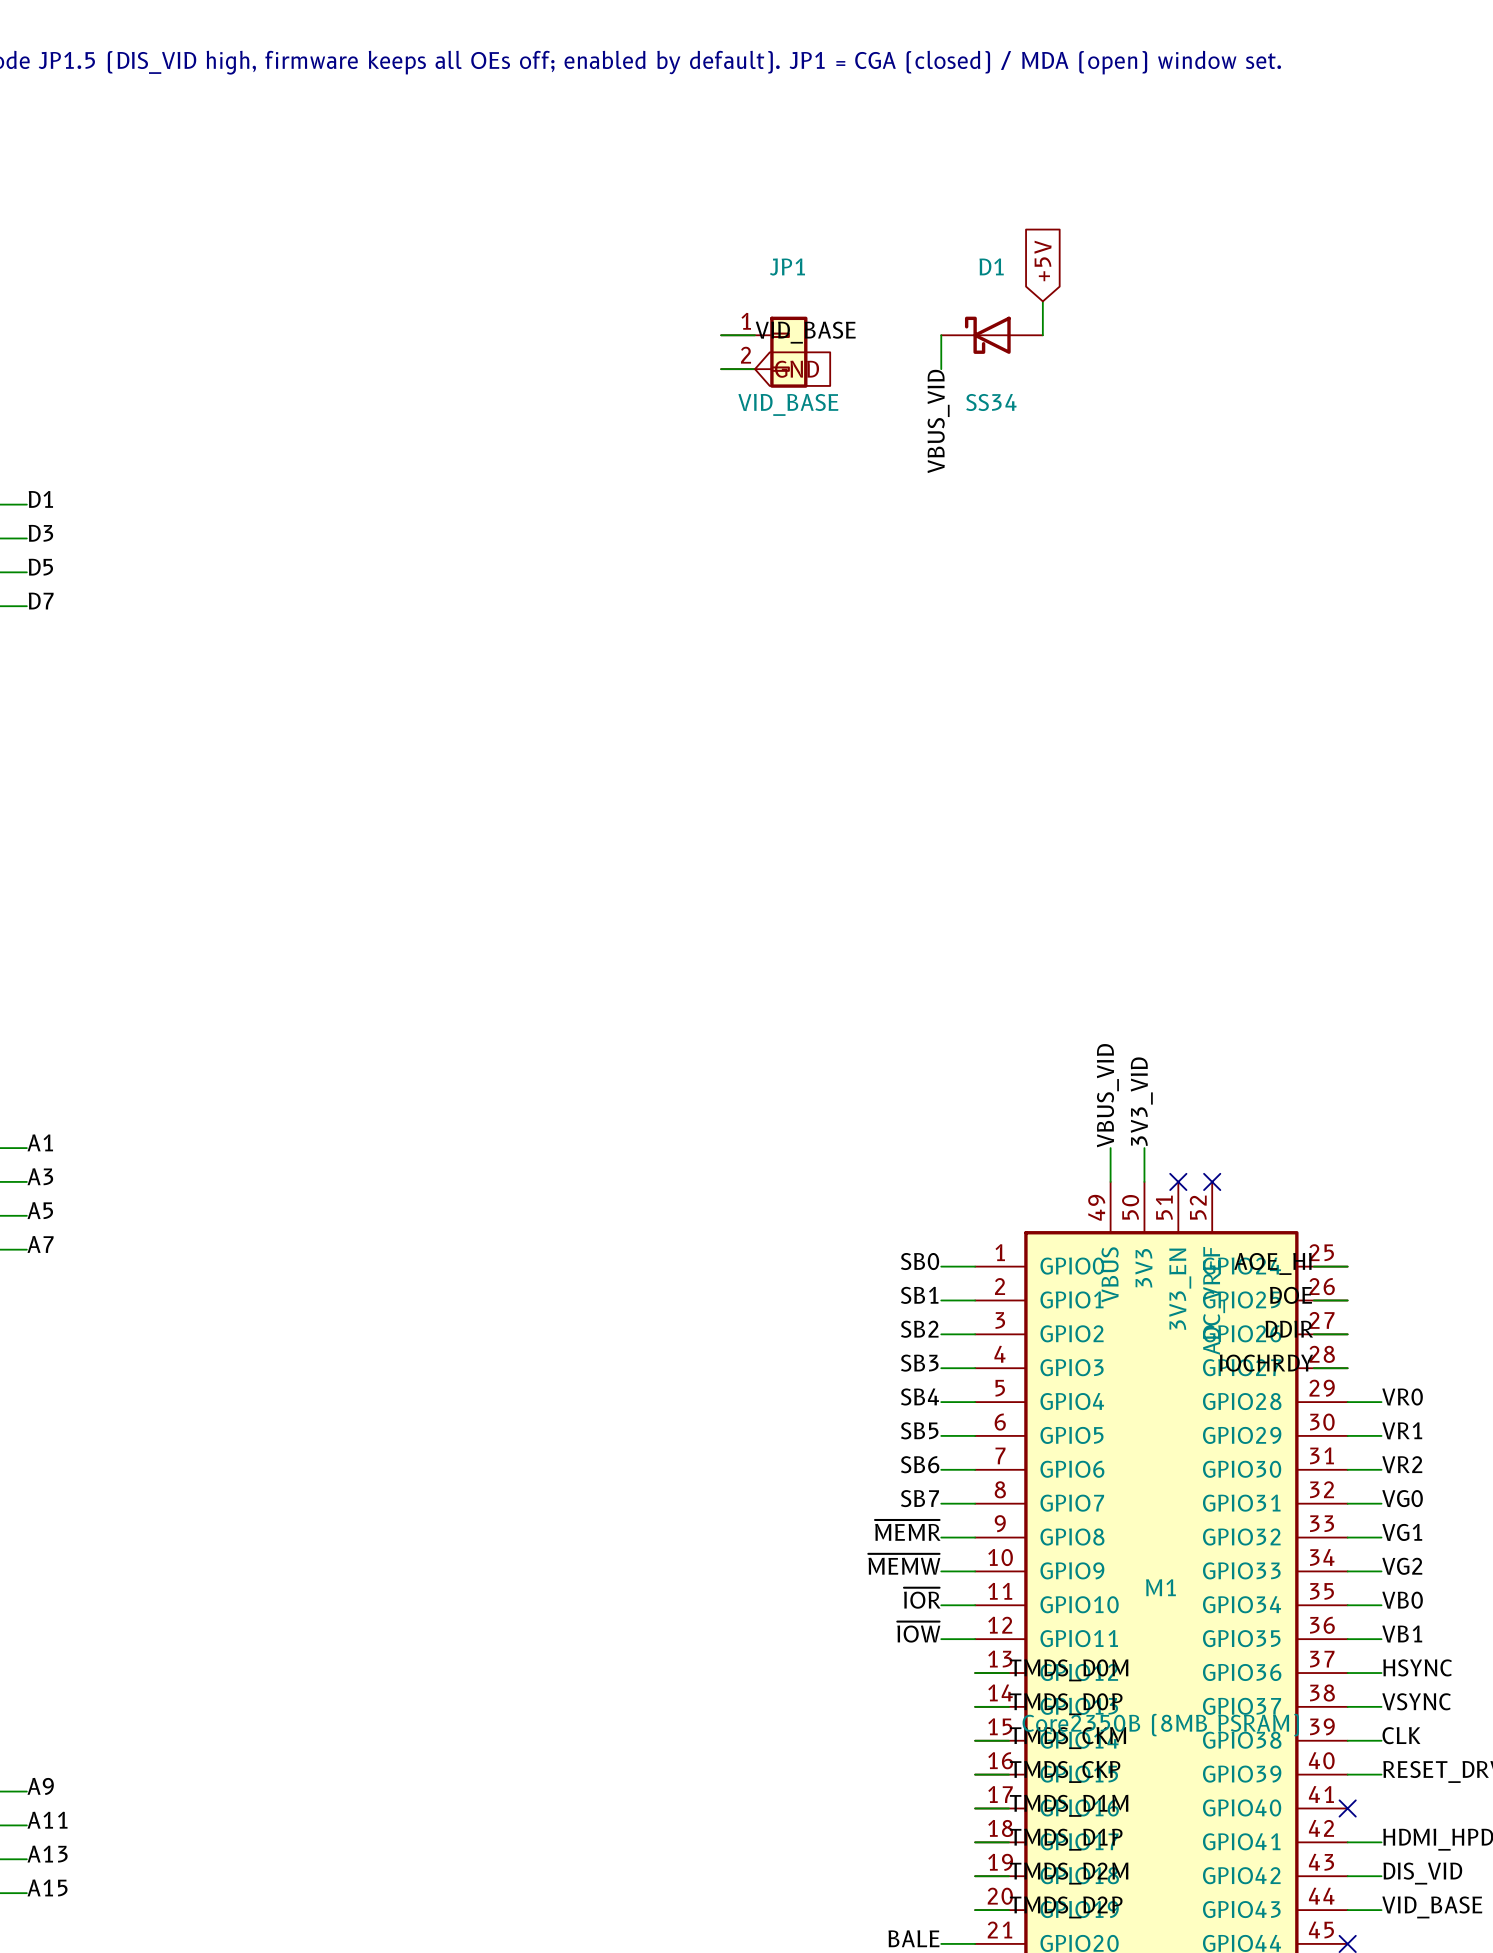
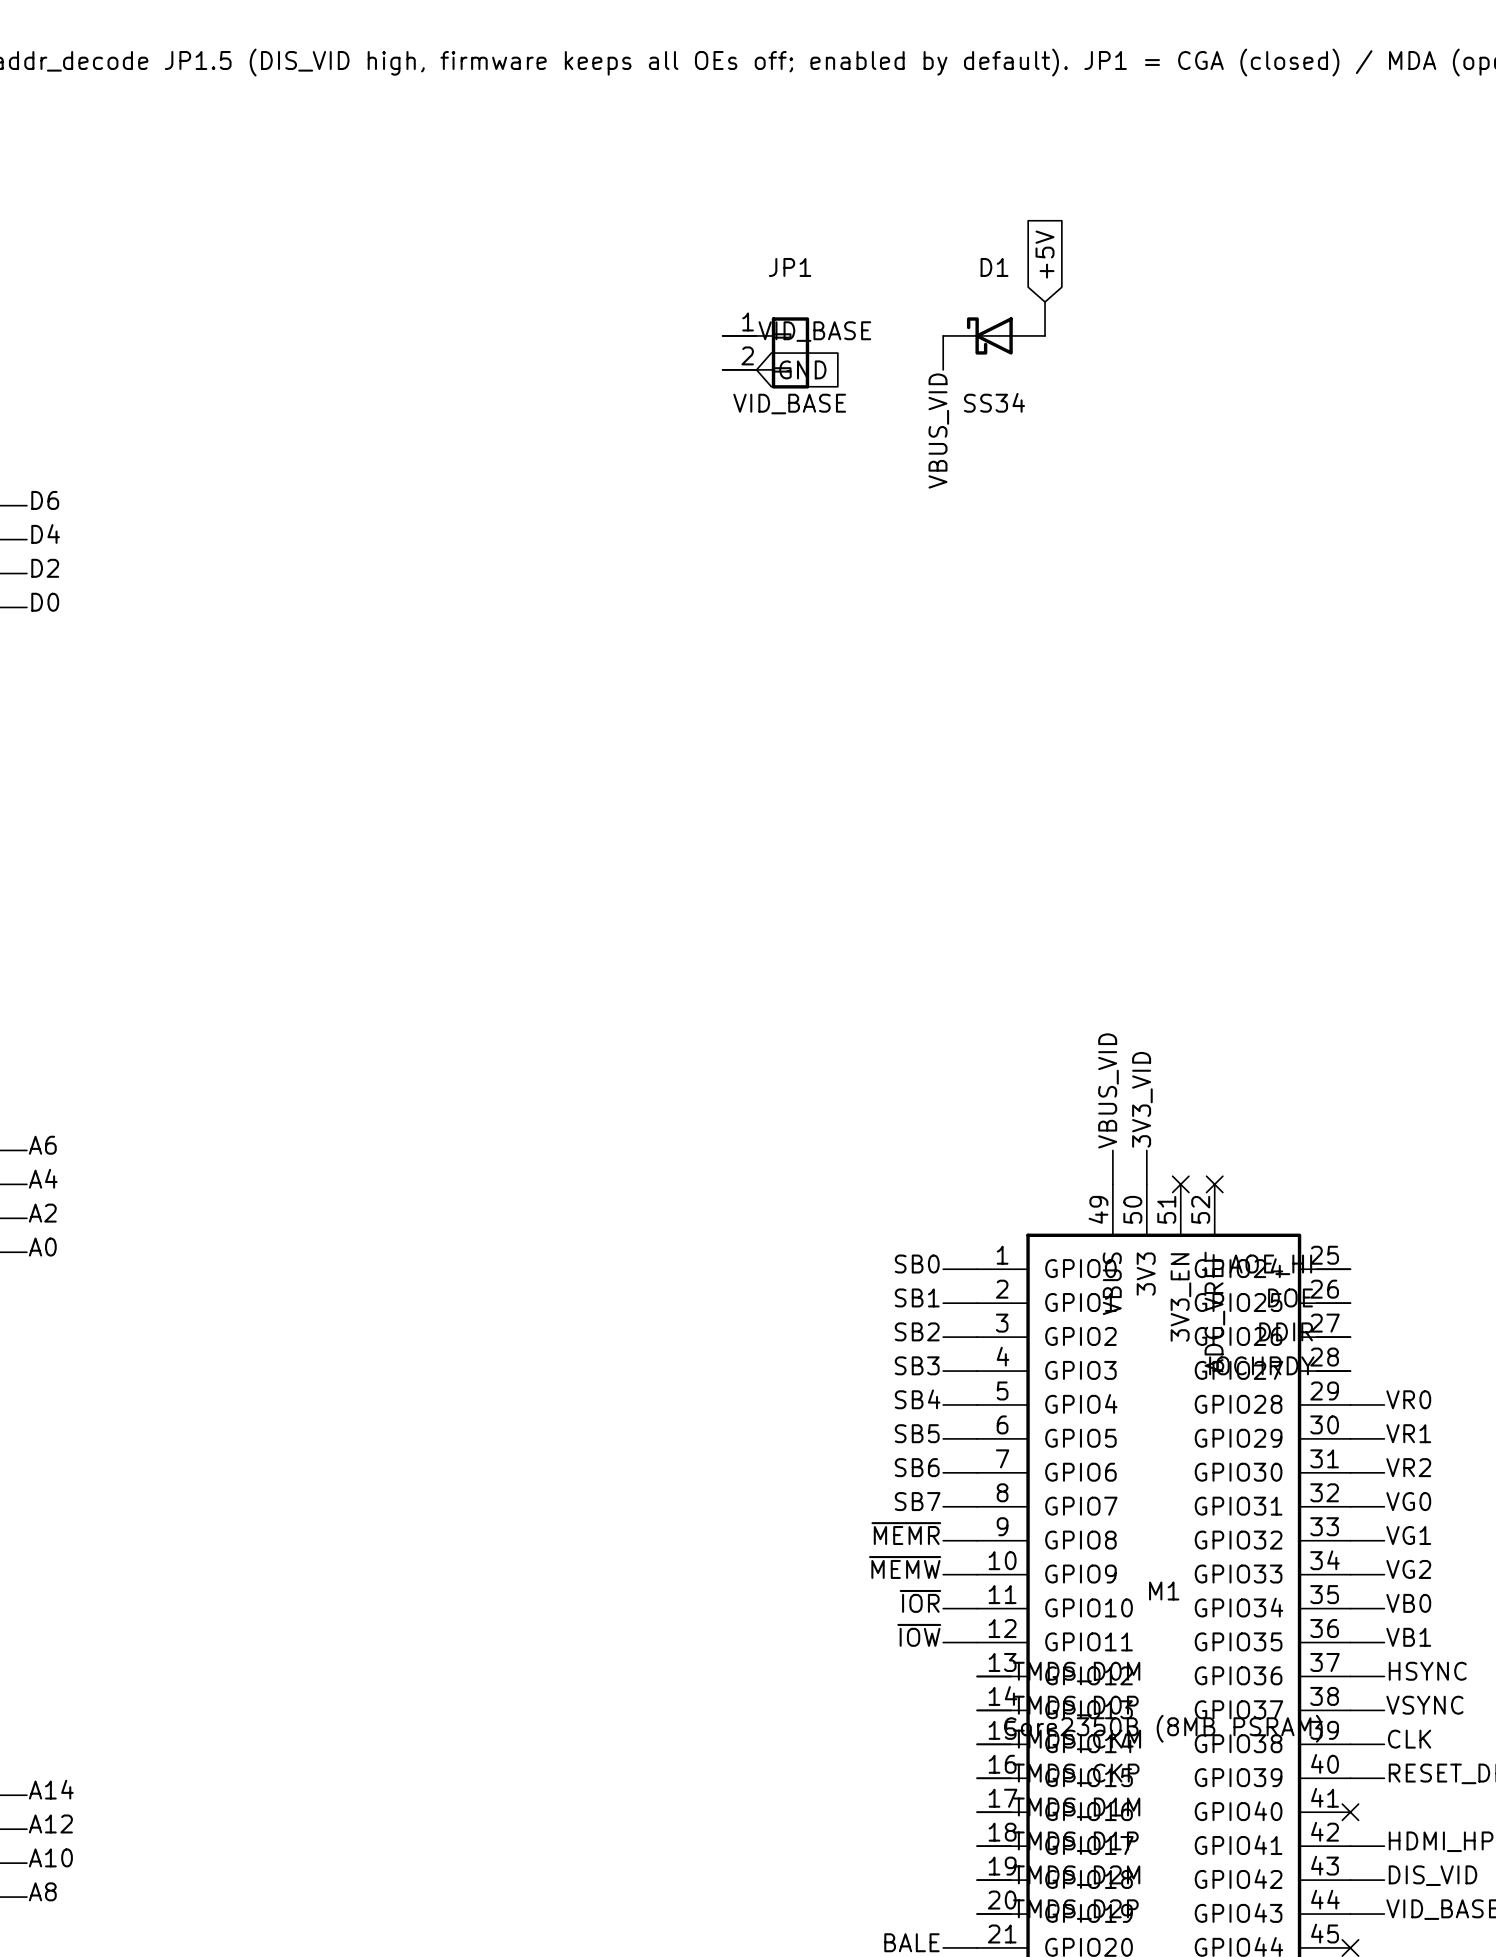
label: D1 (40, 499) -> D6 (45, 500)
label: D3 (40, 533) -> D4 (45, 533)
label: D5 (40, 567) -> D2 (45, 568)
label: D7 (41, 601) -> D0 (45, 602)
label: A1 (40, 1142) -> A6 (42, 1145)
label: A3 (40, 1176) -> A4 (43, 1178)
label: A5 (40, 1210) -> A2 (42, 1213)
label: A7 (40, 1244) -> A0 (42, 1247)
label: A9 (40, 1786) -> A14 (51, 1789)
label: A11 (47, 1820) -> A12 (50, 1823)
label: A13 (47, 1854) -> A10 (50, 1857)
label: A15 (47, 1887) -> A8 (42, 1891)

